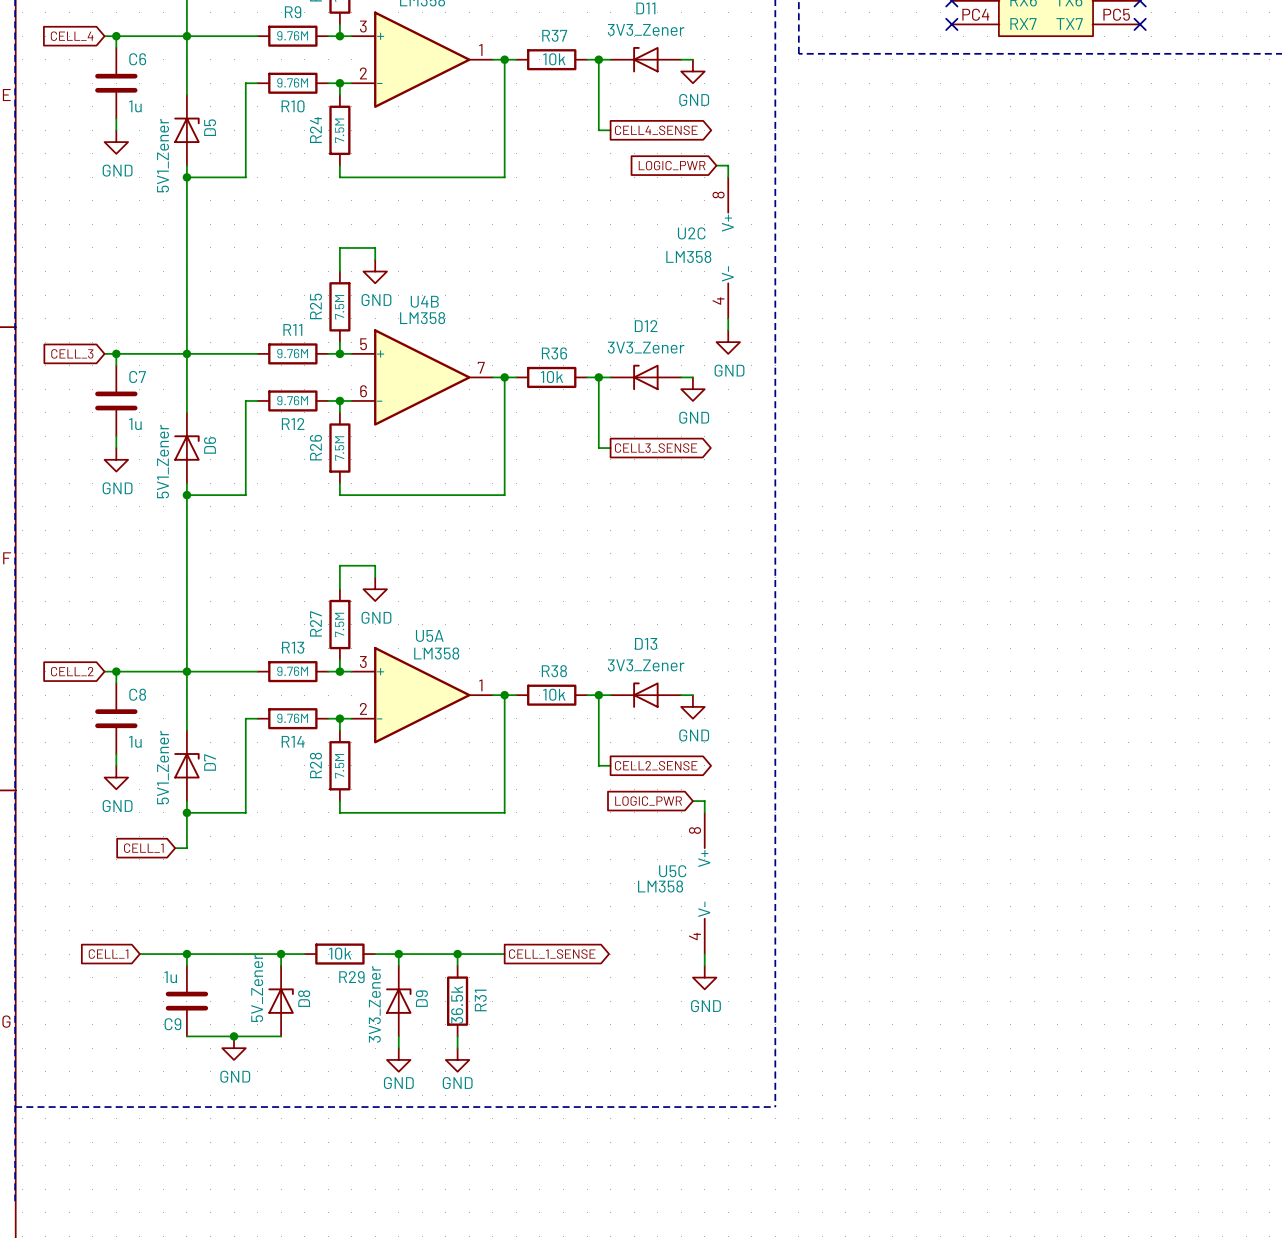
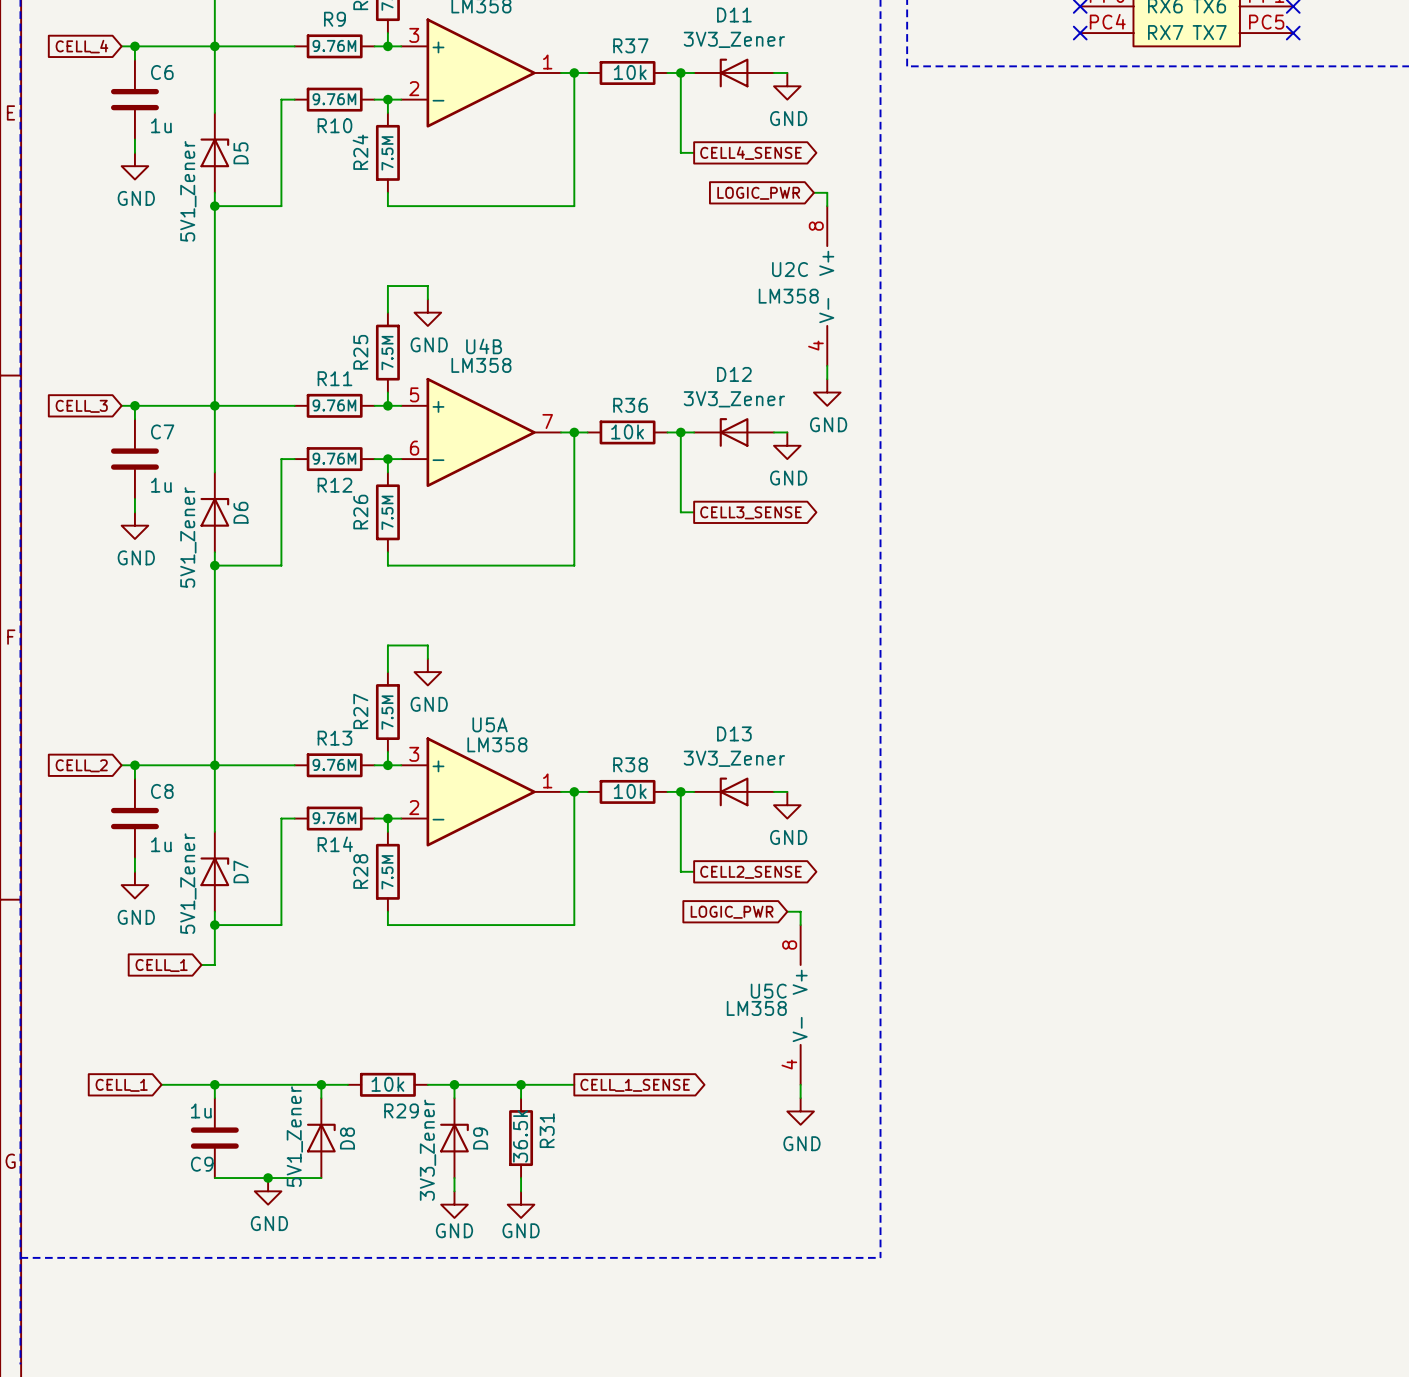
D8 value: 5V_Zener (257, 988) -> 5V1_Zener (294, 1136)

